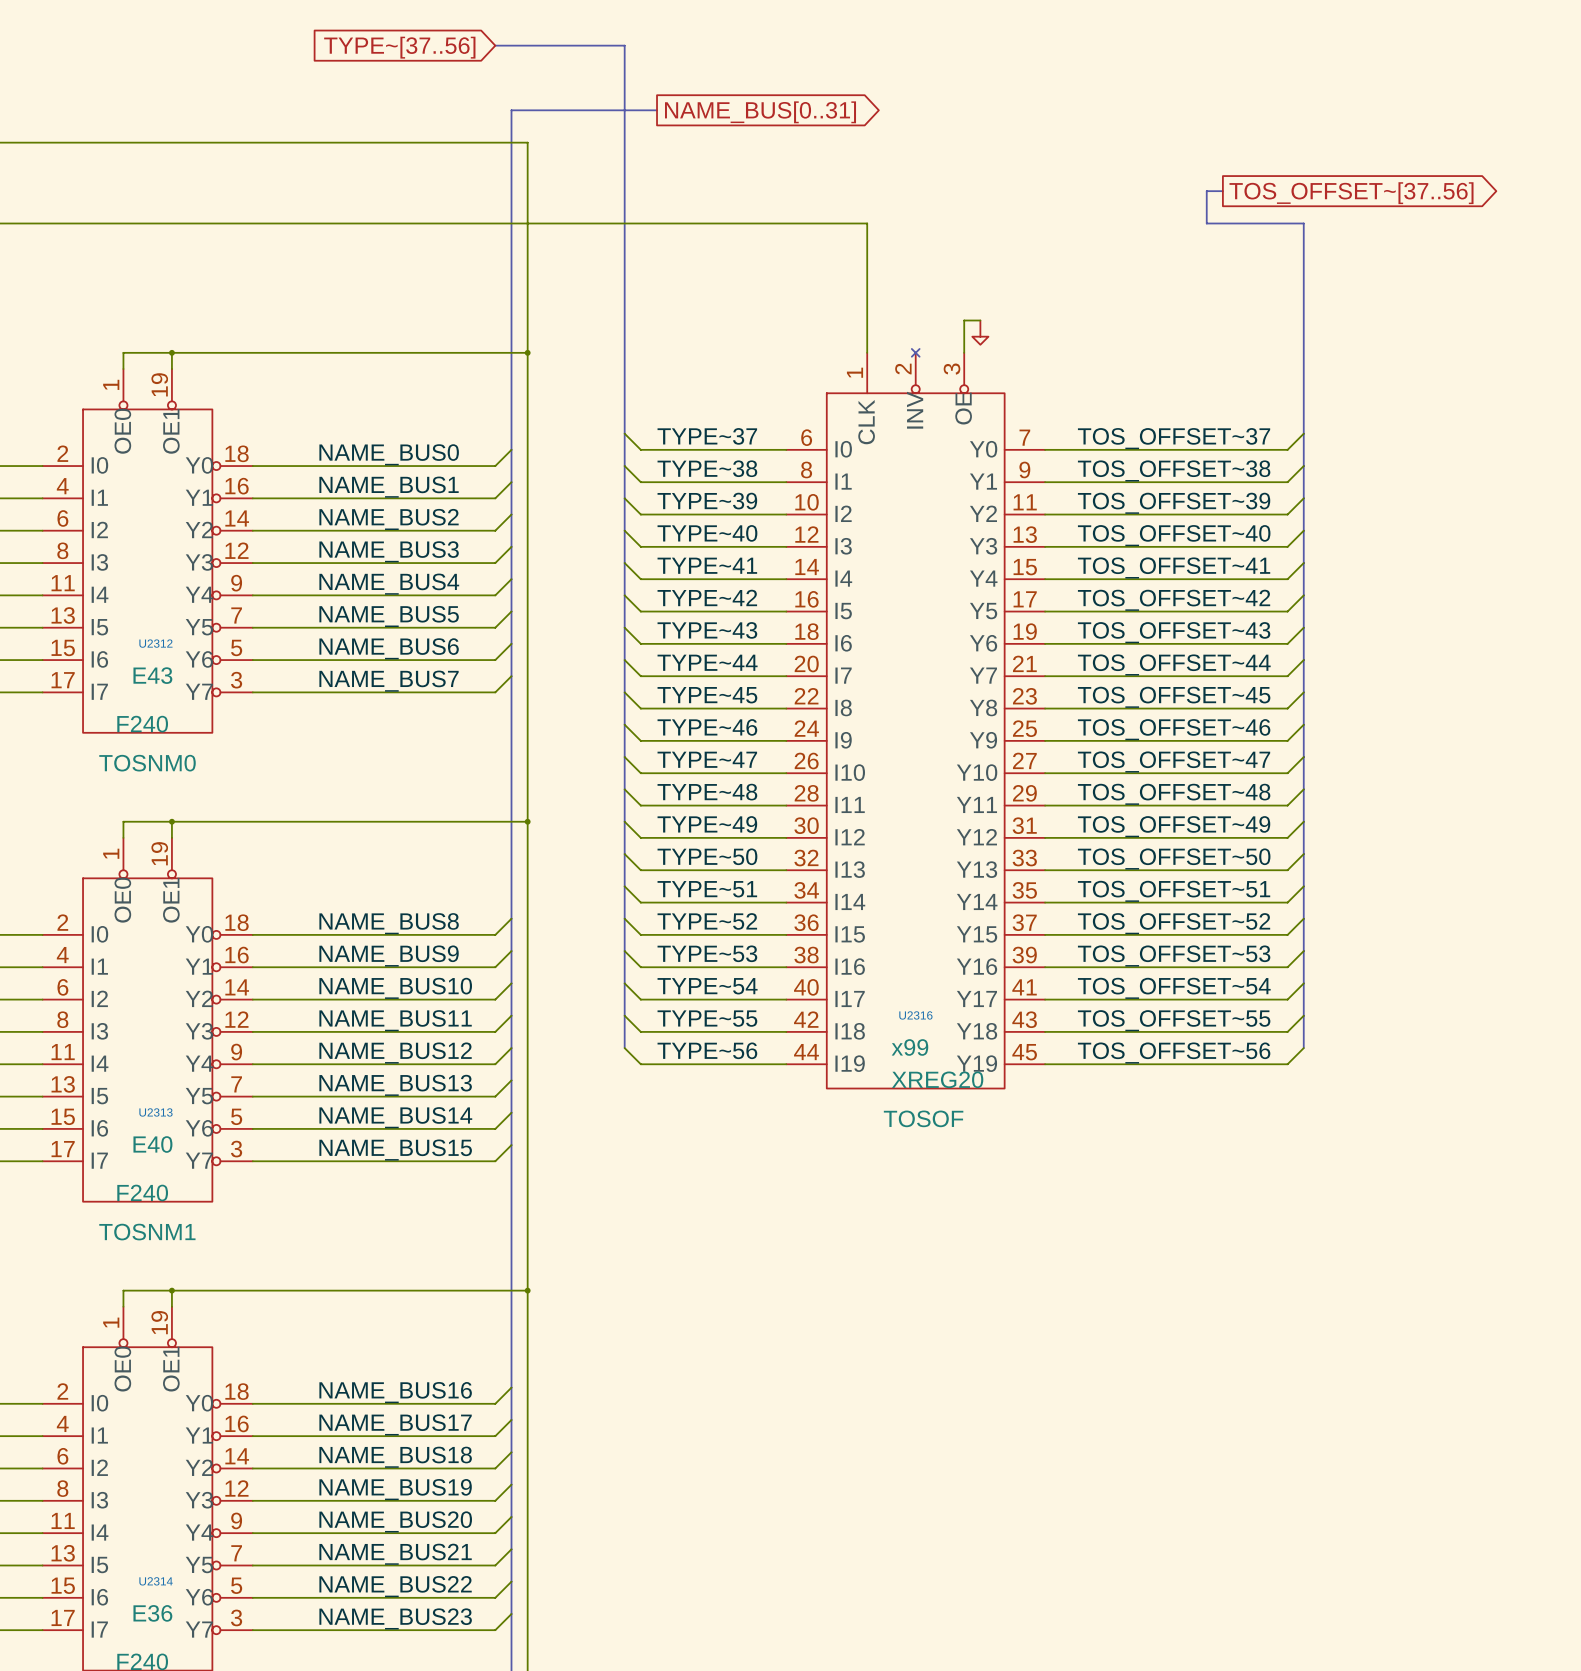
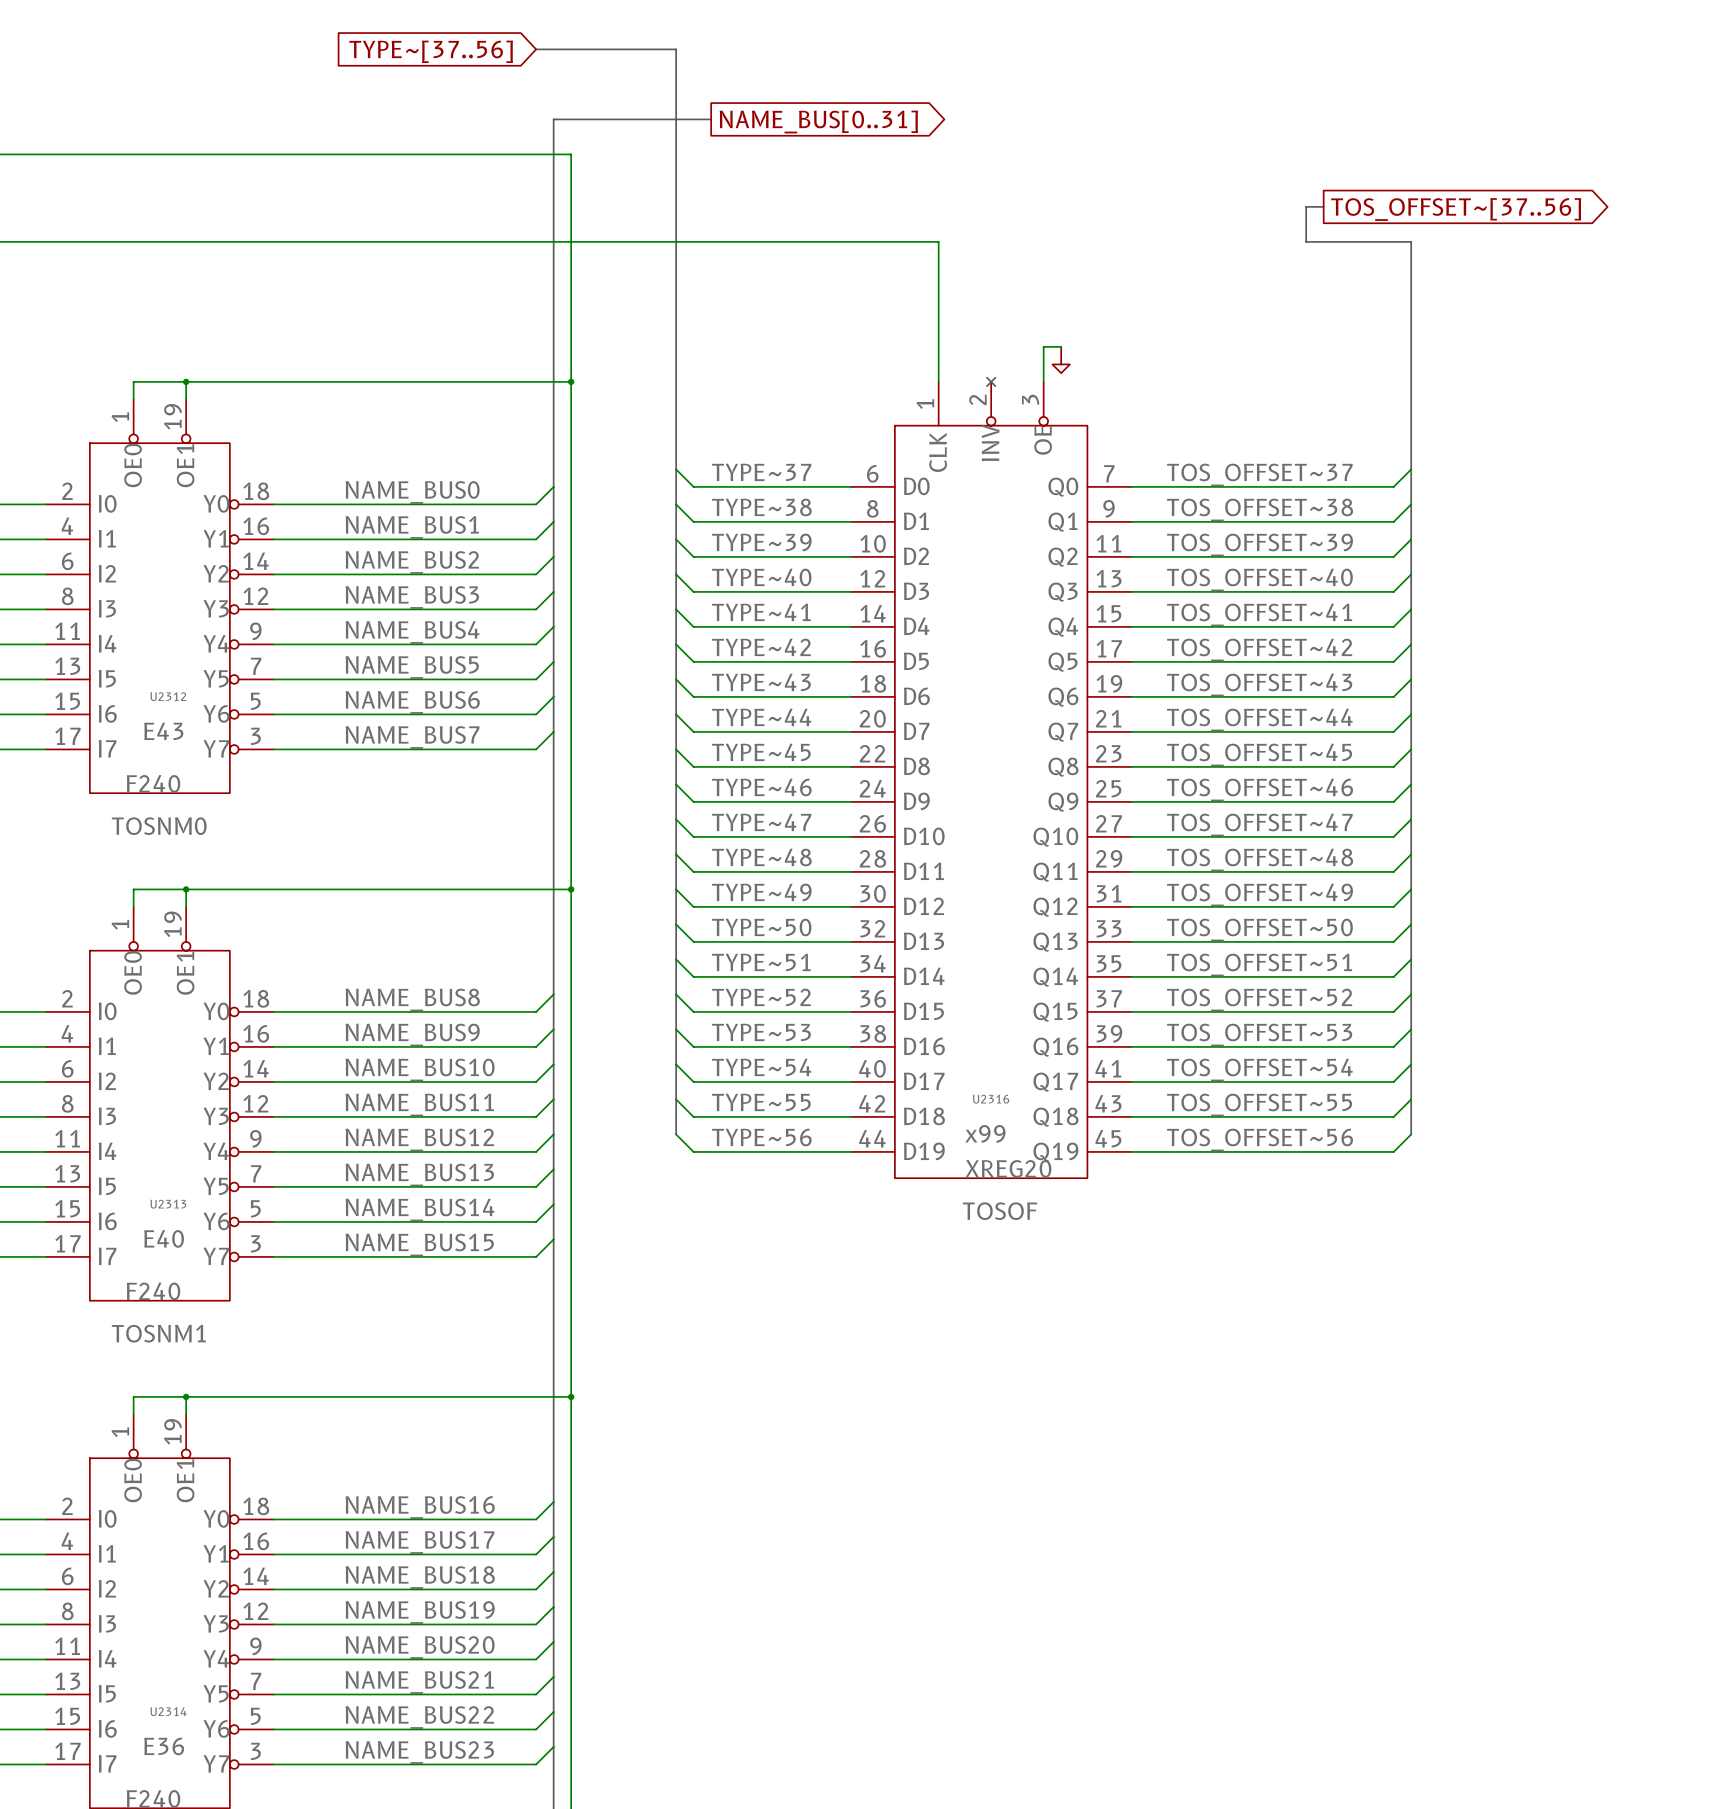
U2316 symbol: [786, 352, 1046, 1089] -> [851, 381, 1132, 1179]

